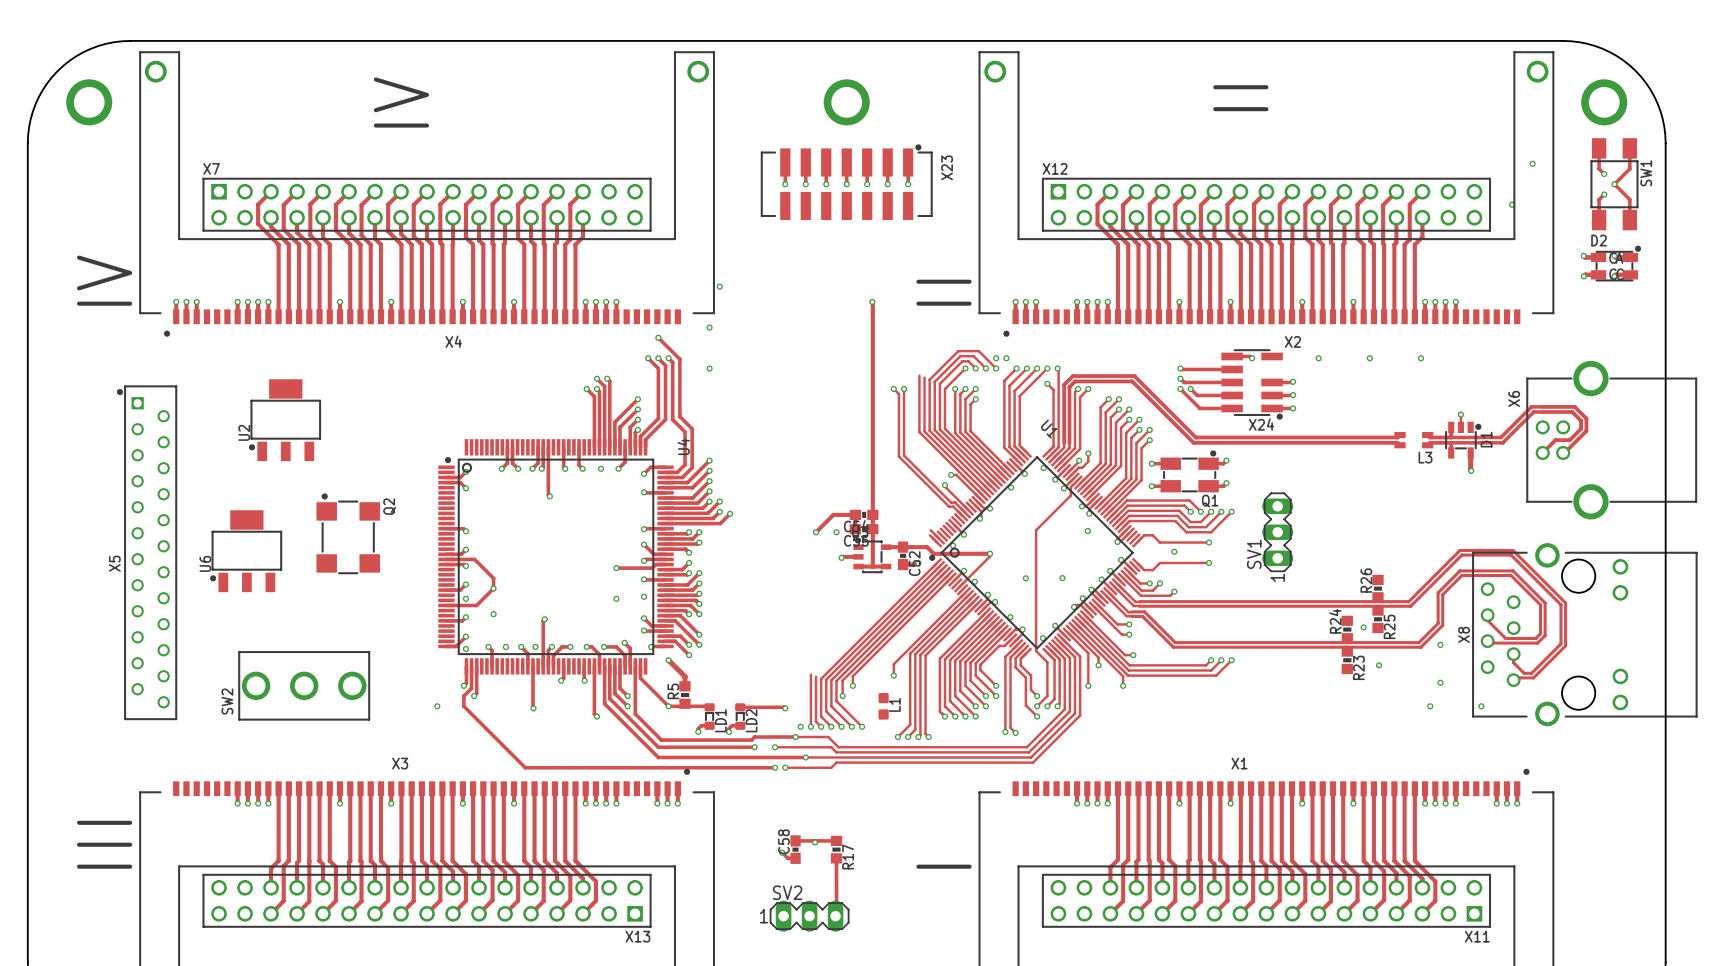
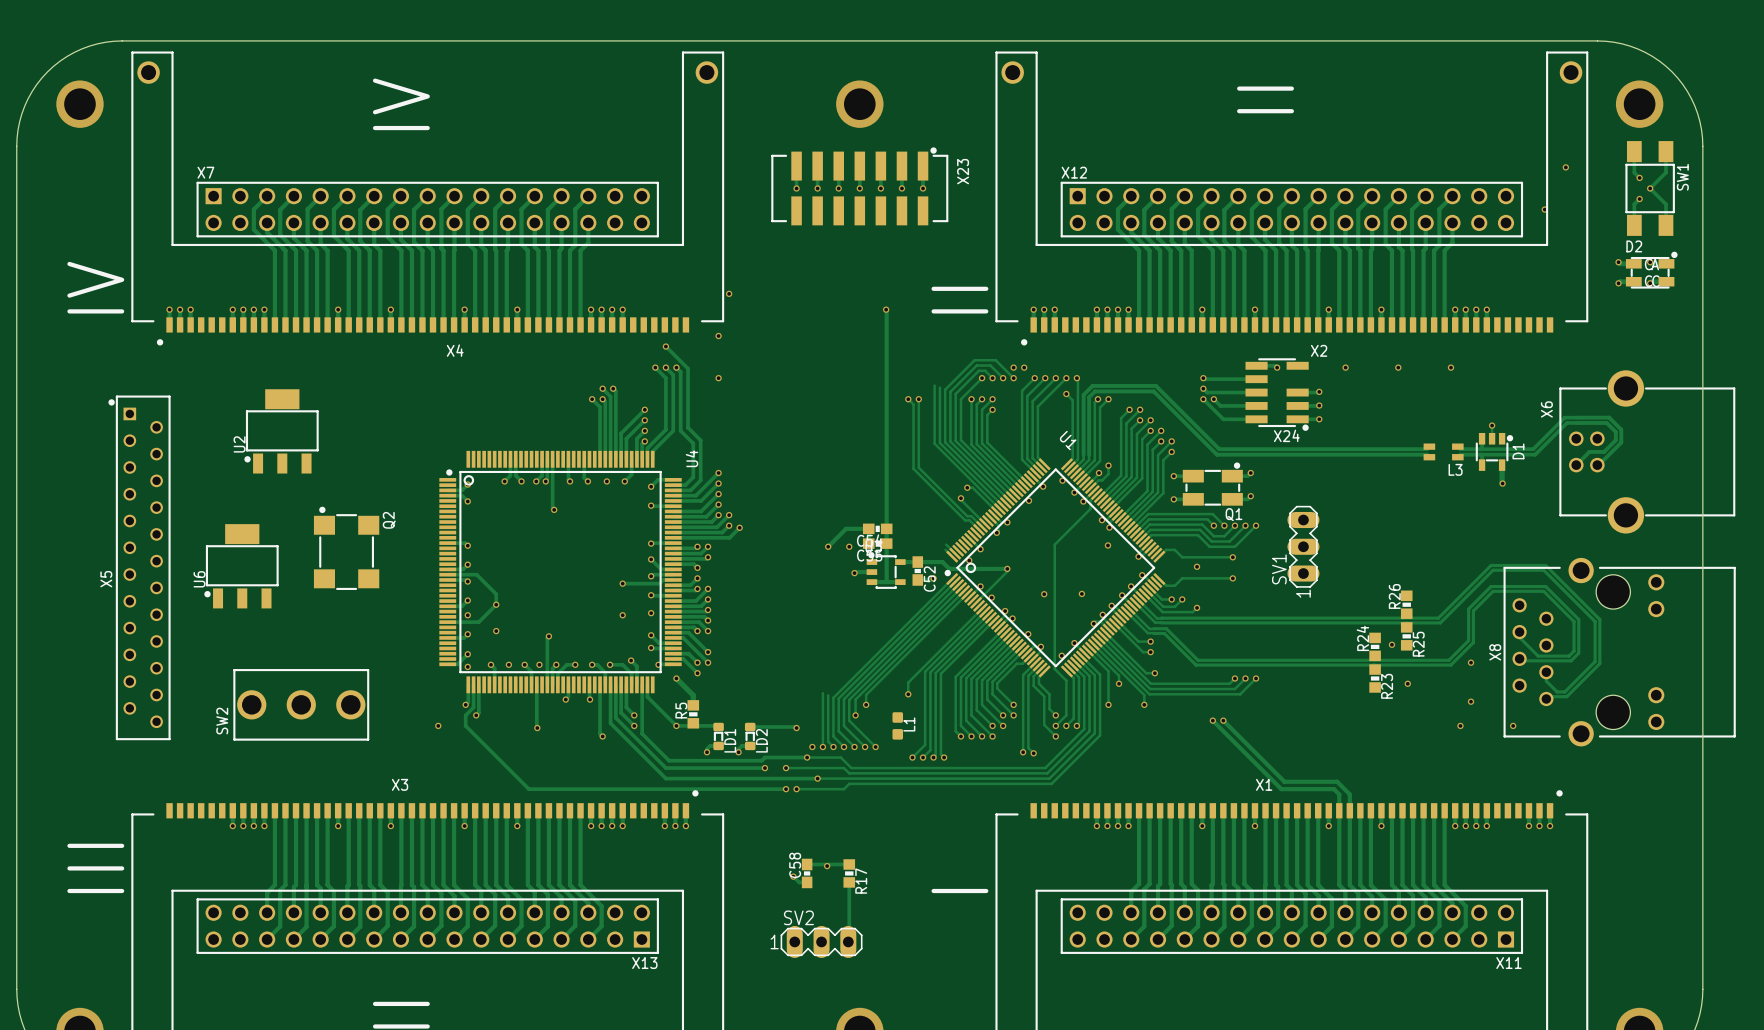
track: none -> (1212, 720) (1281, 789) (1334, 789) (1339, 794) (1339, 810)
via: none -> (1212, 720)
track: none -> (1223, 720) (1284, 781) (1337, 781) (1349, 794) (1349, 810)
via: none -> (1223, 720)

